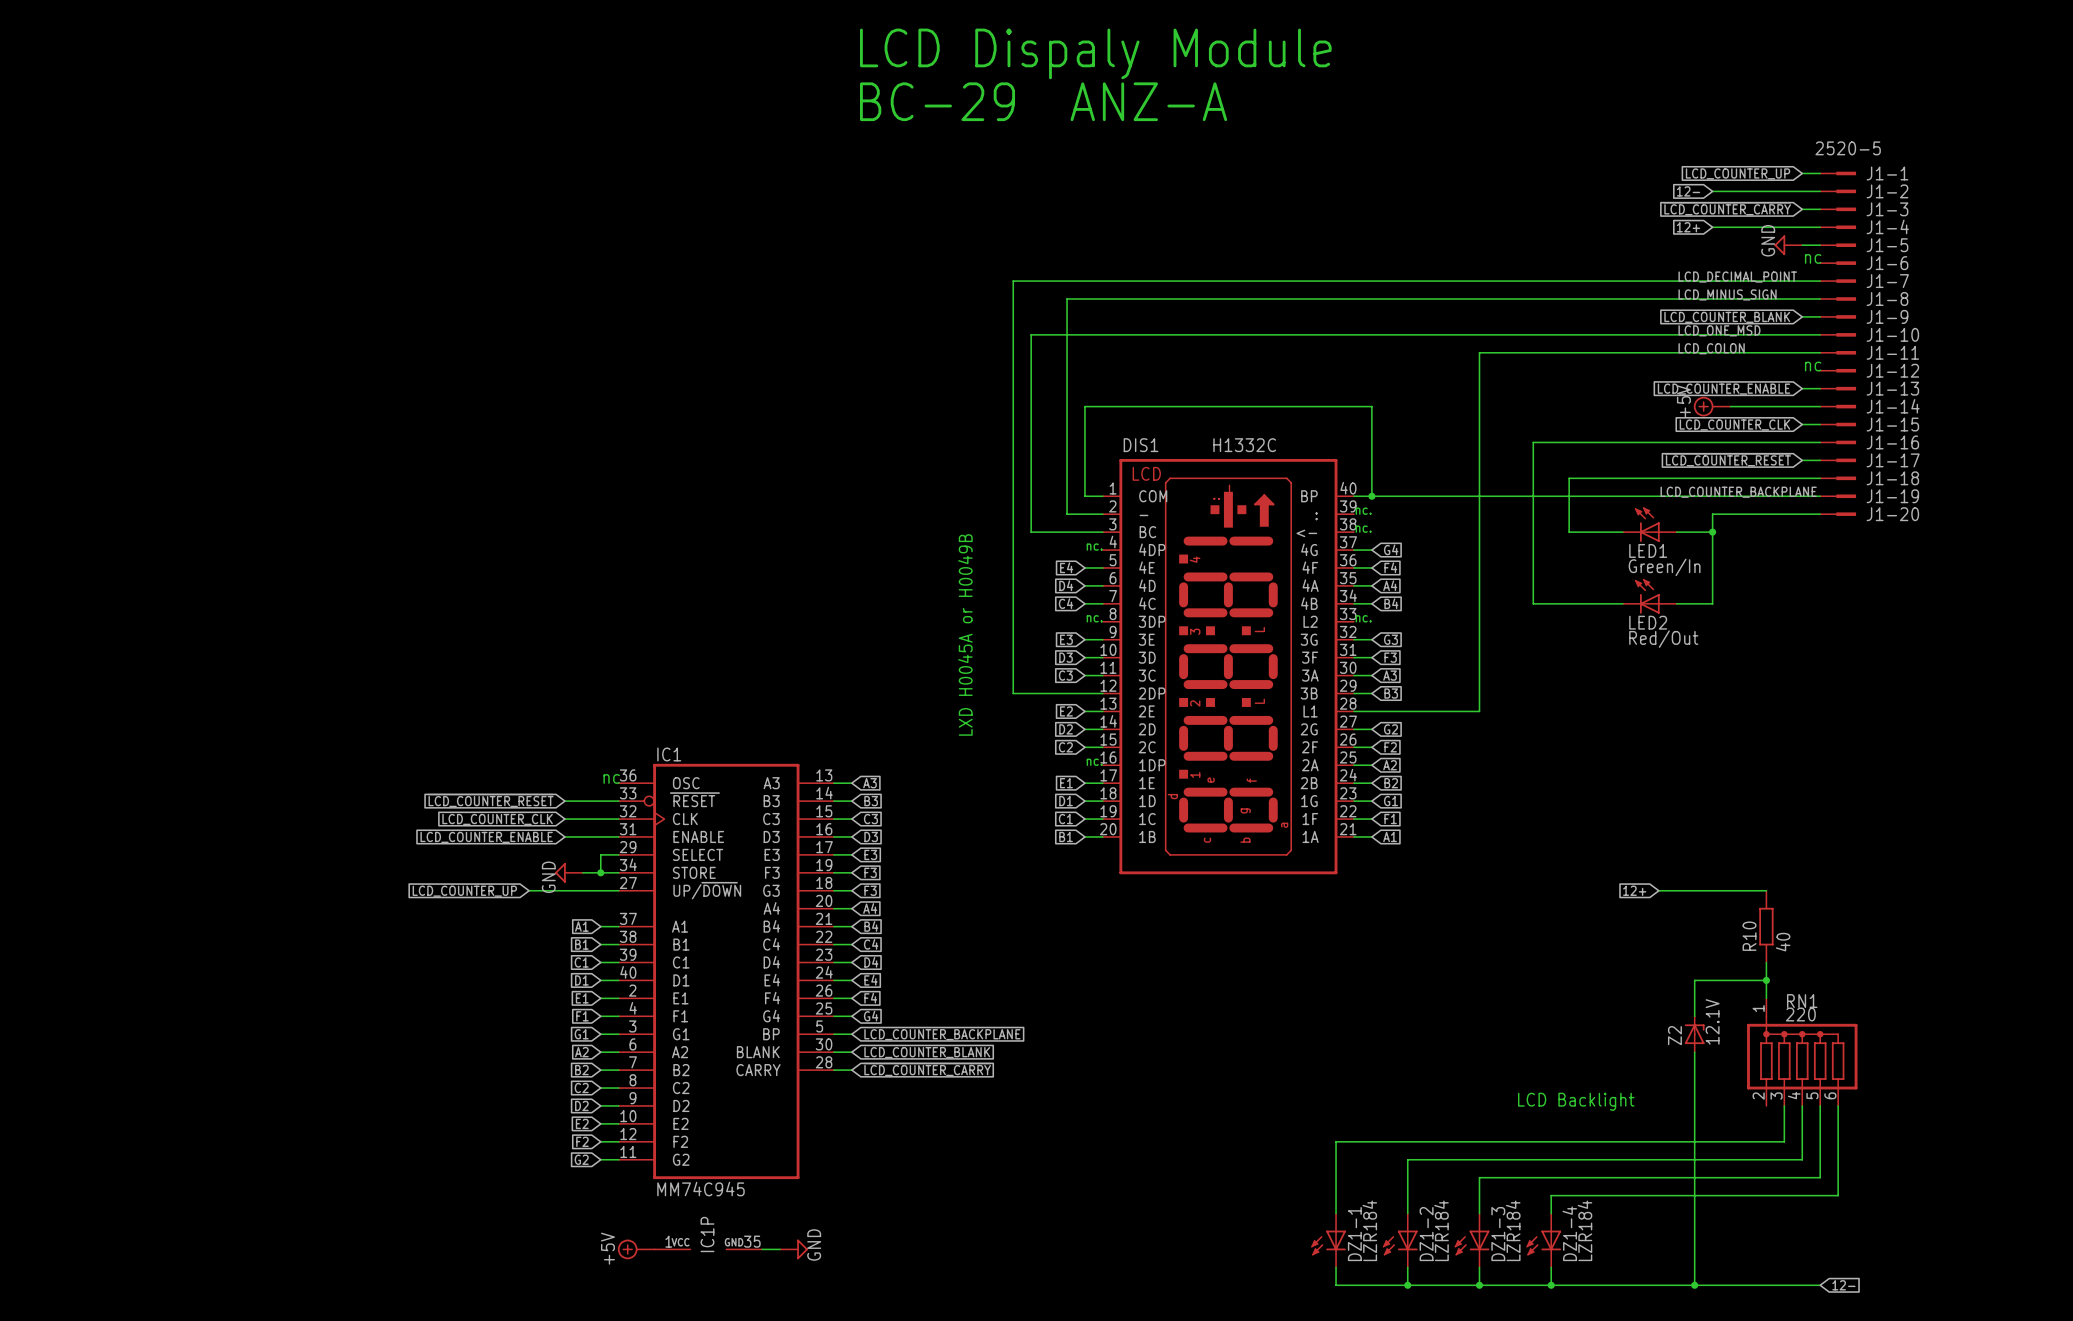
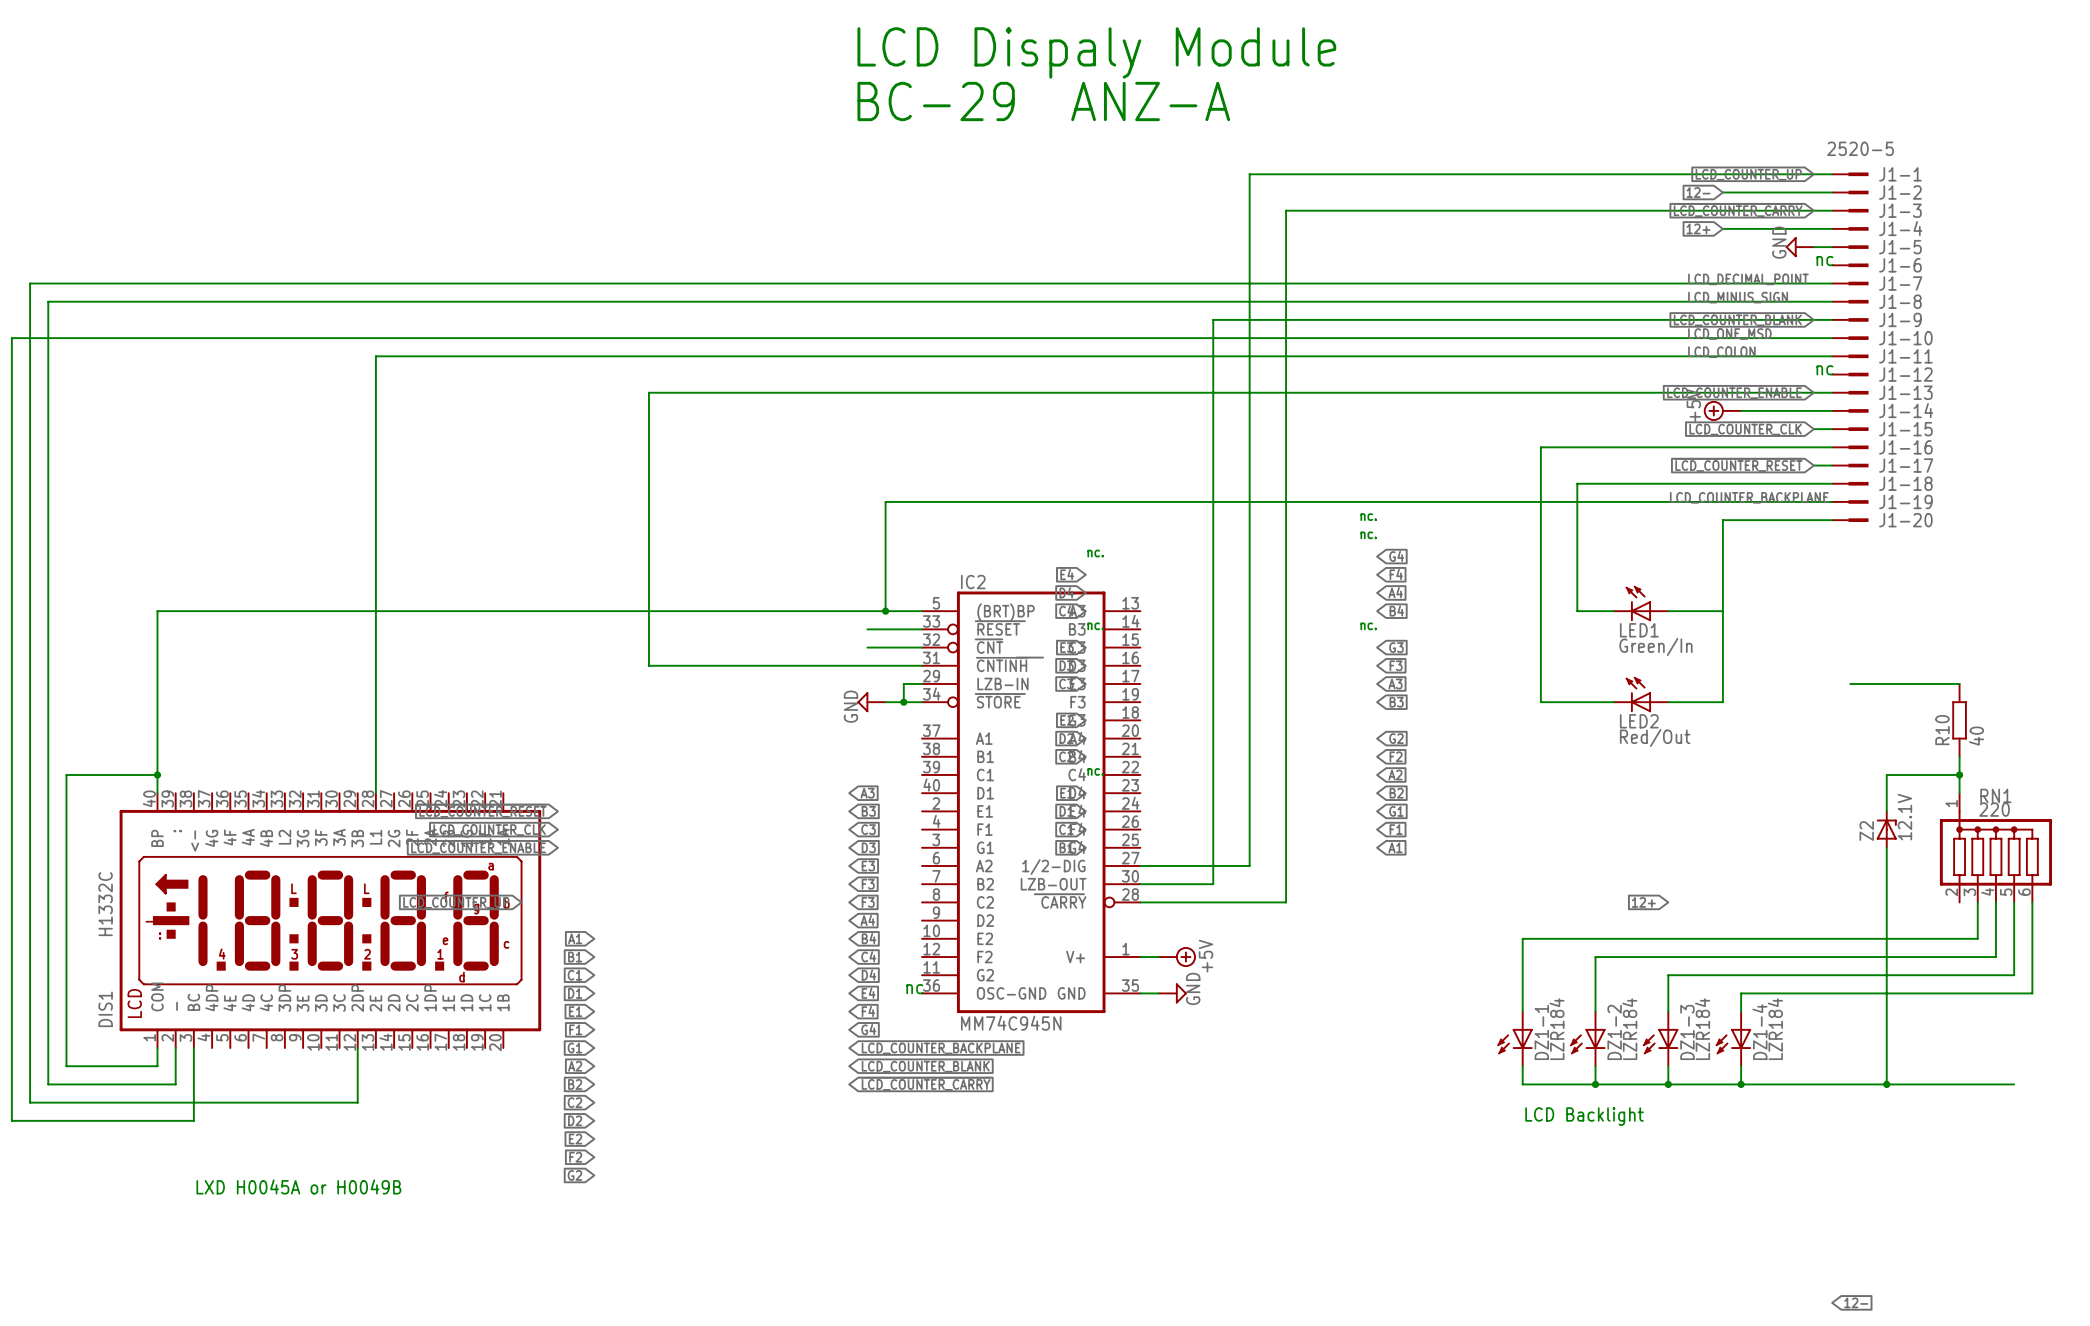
wire: none -> (1813, 174) (1249, 174) (1249, 866) (1140, 866)
wire: none -> (1813, 210) (1286, 210) (1286, 902) (1140, 902)
wire: (1013, 281) (1013, 693) (1102, 693) -> (1013, 283) (30, 283) (30, 1102) (357, 1102) (357, 1048)
wire: (1067, 299) (1067, 514) (1102, 514) -> (1067, 301) (48, 301) (48, 1084) (175, 1084) (175, 1048)
wire: none -> (1813, 319) (1213, 319) (1213, 884) (1140, 884)
wire: (1031, 334) (1031, 532) (1102, 532) -> (1031, 338) (11, 338) (11, 1120) (193, 1120) (193, 1048)
wire: (1479, 352) (1479, 711) (1353, 711) -> (1486, 356) (375, 356) (375, 793)
wire: none -> (1813, 392) (648, 392) (648, 665) (922, 665)
DIS1 name position: DIS1 (1141, 445) -> DIS1 (105, 1009)
DIS1 value position: H1332C (1244, 445) -> H1332C (105, 904)
DIS1 symbol: [1102, 458, 1354, 875] -> [119, 793, 542, 1049]
wire: (1084, 496) (1084, 406) (1371, 406) (1371, 496) -> (1085, 501) (885, 501) (885, 611)
wire: none -> (1104, 501) (1358, 501)
junction: (1371, 496) -> none
LED1 position: (1649, 524) -> (1641, 603)
wire: (1569, 532) (1622, 532) -> none
wire: (1676, 532) (1712, 532) -> none
junction: (1712, 532) -> none
wire: (1353, 550) (1371, 550) -> none
wire: (1084, 567) (1102, 567) -> none
wire: (1353, 567) (1371, 567) -> none
wire: (1353, 585) (1371, 585) -> none
LED2 position: (1649, 596) -> (1641, 694)
junction: none -> (885, 611)
wire: none -> (922, 611) (157, 611) (157, 793)
wire: (1084, 603) (1102, 603) -> none
wire: (1353, 603) (1371, 603) -> none
wire: (1533, 603) (1569, 603) -> (1577, 538) (1577, 611)
wire: none -> (1540, 611) (1540, 702) (1613, 702)
wire: none -> (1722, 611) (1722, 702) (1668, 702)
wire: none -> (867, 629) (922, 629)
text: LXD H0045A or H0049B (965, 635) -> none
wire: none -> (867, 647) (922, 647)
wire: (1084, 639) (1102, 639) -> none
wire: (1353, 639) (1371, 639) -> none
wire: (1084, 657) (1102, 657) -> none
wire: (1353, 657) (1371, 657) -> none
wire: none -> (922, 683) (903, 683) (903, 702)
wire: (1084, 675) (1102, 675) -> none
wire: (1353, 675) (1371, 675) -> none
wire: none -> (1850, 683) (1959, 683)
power symbol: none -> GND (871, 702)
wire: none -> (885, 702) (922, 702)
junction: none -> (903, 702)
wire: (1353, 693) (1371, 693) -> none
wire: (1084, 711) (1102, 711) -> none
wire: (1084, 729) (1102, 729) -> none
wire: (1353, 729) (1371, 729) -> none
wire: (1084, 747) (1102, 747) -> none
wire: (1353, 747) (1371, 747) -> none
wire: none -> (1959, 756) (1959, 793)
wire: none -> (157, 774) (66, 774) (66, 1066) (157, 1066) (157, 1048)
junction: none -> (157, 774)
wire: (1353, 765) (1371, 765) -> none
wire: none -> (1959, 774) (1886, 774) (1886, 811)
junction: none -> (1959, 774)
text: nc (611, 778) -> none
wire: (833, 783) (851, 783) -> none
wire: (1084, 783) (1102, 783) -> none
wire: (1353, 783) (1371, 783) -> none
IC2: none -> MM74C945N (1031, 802)
wire: (564, 801) (618, 801) -> none
wire: (833, 801) (851, 801) -> none
wire: (1084, 801) (1102, 801) -> (1140, 957) (1158, 957)
wire: (1353, 801) (1371, 801) -> none
wire: (564, 819) (618, 819) -> none
wire: (833, 819) (851, 819) -> none
wire: (1084, 819) (1102, 819) -> none
wire: (1353, 819) (1371, 819) -> none
wire: (564, 836) (618, 836) -> none
wire: (833, 836) (851, 836) -> none
wire: (1084, 836) (1102, 836) -> (1140, 993) (1158, 993)
wire: (1353, 836) (1371, 836) -> none
wire: none -> (1886, 847) (1886, 1084)
wire: (618, 854) (600, 854) (600, 872) -> none
wire: (833, 854) (851, 854) -> none
power symbol: GND (568, 872) -> none
wire: (582, 872) (618, 872) -> none
junction: (600, 872) -> none
wire: (833, 872) (851, 872) -> none
wire: (529, 890) (618, 890) -> none
wire: (833, 890) (851, 890) -> none
wire: (1658, 890) (1766, 890) -> none
wire: none -> (1977, 902) (1977, 938) (1522, 938) (1522, 1011)
wire: none -> (1995, 902) (1995, 957) (1595, 957) (1595, 1011)
wire: none -> (2014, 902) (2014, 975) (1668, 975) (1668, 1011)
wire: none -> (2032, 902) (2032, 993) (1777, 993)
wire: (833, 908) (851, 908) -> none
wire: (600, 926) (618, 926) -> none
wire: (833, 926) (851, 926) -> none
R10 position: (1766, 926) -> (1959, 720)
wire: (600, 944) (618, 944) -> none
wire: (833, 944) (851, 944) -> none
power symbol: none -> +5V (1177, 957)
wire: (600, 962) (618, 962) -> none
wire: (833, 962) (851, 962) -> none
wire: (1766, 962) (1766, 998) -> none
IC1: MM74C945 (726, 971) -> none
text: none -> nc (914, 989)
wire: (600, 980) (618, 980) -> none
wire: (833, 980) (851, 980) -> none
power symbol: none -> GND (1172, 993)
wire: (1730, 980) (1694, 980) (1694, 1016) -> (1741, 993) (1741, 1011)
junction: (1766, 980) -> none
wire: (600, 998) (618, 998) -> none
wire: (833, 998) (851, 998) -> none
wire: (600, 1016) (618, 1016) -> none
wire: (833, 1016) (851, 1016) -> none
wire: (600, 1034) (618, 1034) -> none
wire: (833, 1034) (851, 1034) -> none
Z2 position: (1694, 1034) -> (1886, 829)
wire: (600, 1052) (618, 1052) -> none
wire: (833, 1052) (851, 1052) -> none
wire: none -> (1522, 1066) (1522, 1084) (2014, 1084)
wire: none -> (1595, 1066) (1595, 1084)
wire: none -> (1668, 1066) (1668, 1084)
wire: (1694, 1052) (1694, 1285) -> none
wire: none -> (1741, 1066) (1741, 1084)
RN1 position: (1802, 1052) -> (1995, 847)
wire: (600, 1070) (618, 1070) -> none
wire: (833, 1070) (851, 1070) -> none
junction: none -> (1595, 1084)
junction: none -> (1668, 1084)
junction: none -> (1741, 1084)
junction: none -> (1886, 1084)
wire: (600, 1088) (618, 1088) -> none
wire: (600, 1105) (618, 1105) -> none
wire: (1784, 1105) (1784, 1141) (1336, 1141) (1336, 1213) -> none
wire: (1802, 1105) (1802, 1159) (1407, 1159) (1407, 1213) -> none
wire: (1820, 1105) (1820, 1177) (1479, 1177) (1479, 1213) -> none
wire: (1838, 1105) (1838, 1195) (1551, 1195) (1551, 1213) -> none
wire: (600, 1123) (618, 1123) -> none
wire: (600, 1141) (618, 1141) -> none
wire: (600, 1159) (618, 1159) -> none
text: none -> LXD H0045A or H0049B (298, 1186)
DZ1-1 position: (1328, 1240) -> (1515, 1038)
DZ1-2 position: (1400, 1240) -> (1587, 1038)
DZ1-3 position: (1472, 1240) -> (1660, 1038)
DZ1-4 position: (1543, 1240) -> (1733, 1038)
power symbol: +5V (636, 1249) -> none
IC1P: (708, 1249) -> none
wire: (762, 1249) (780, 1249) -> none
power symbol: GND (794, 1249) -> none
wire: (1336, 1267) (1336, 1285) (1820, 1285) -> none
wire: (1407, 1267) (1407, 1285) -> none
wire: (1479, 1267) (1479, 1285) -> none
wire: (1551, 1267) (1551, 1285) -> none
junction: (1407, 1285) -> none
junction: (1479, 1285) -> none
junction: (1551, 1285) -> none
junction: (1694, 1285) -> none

